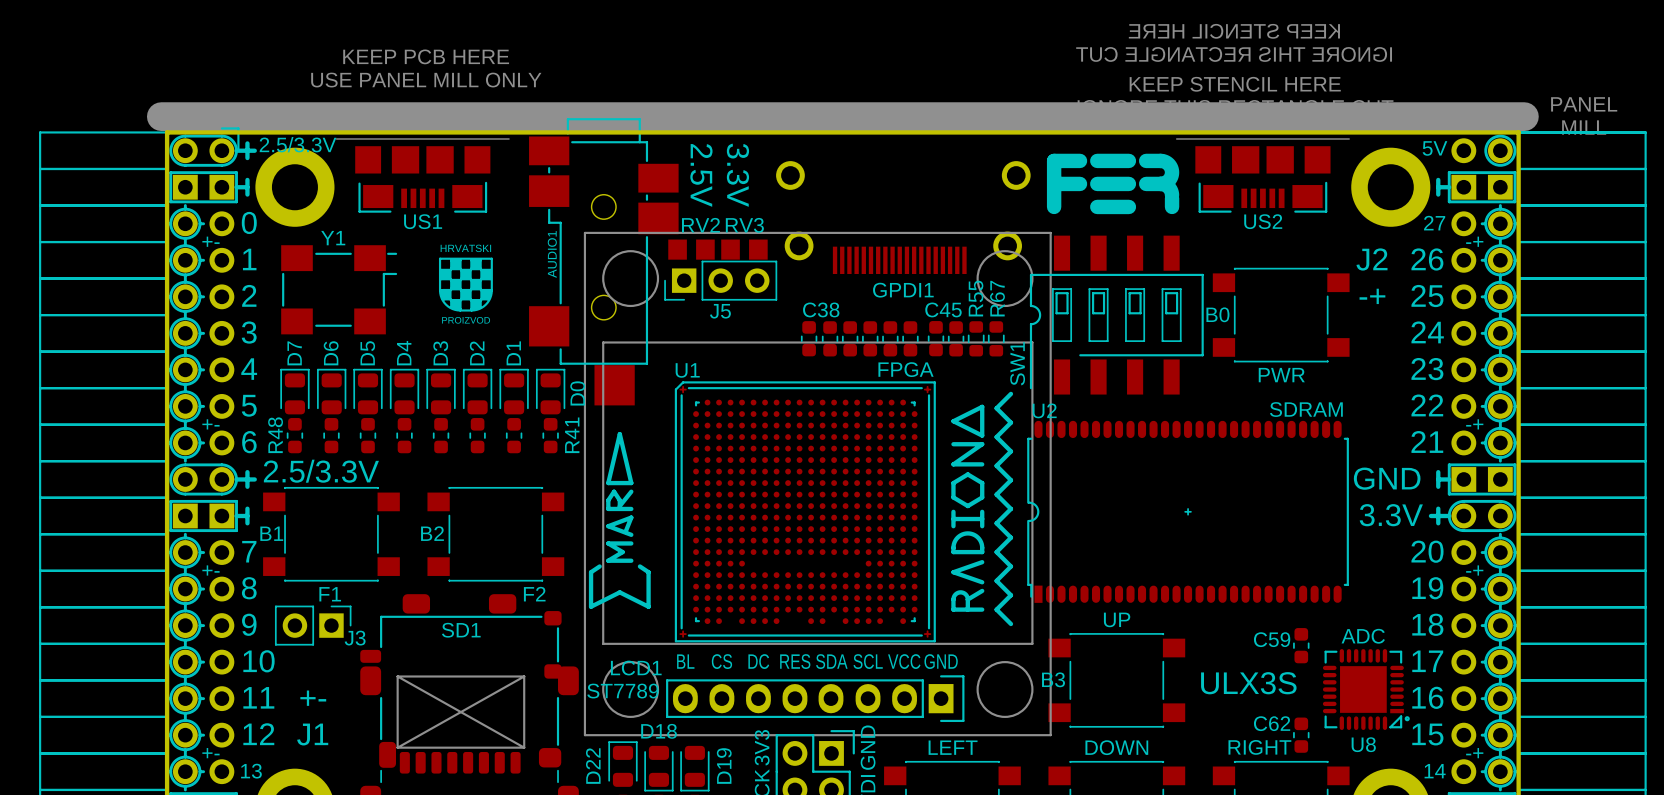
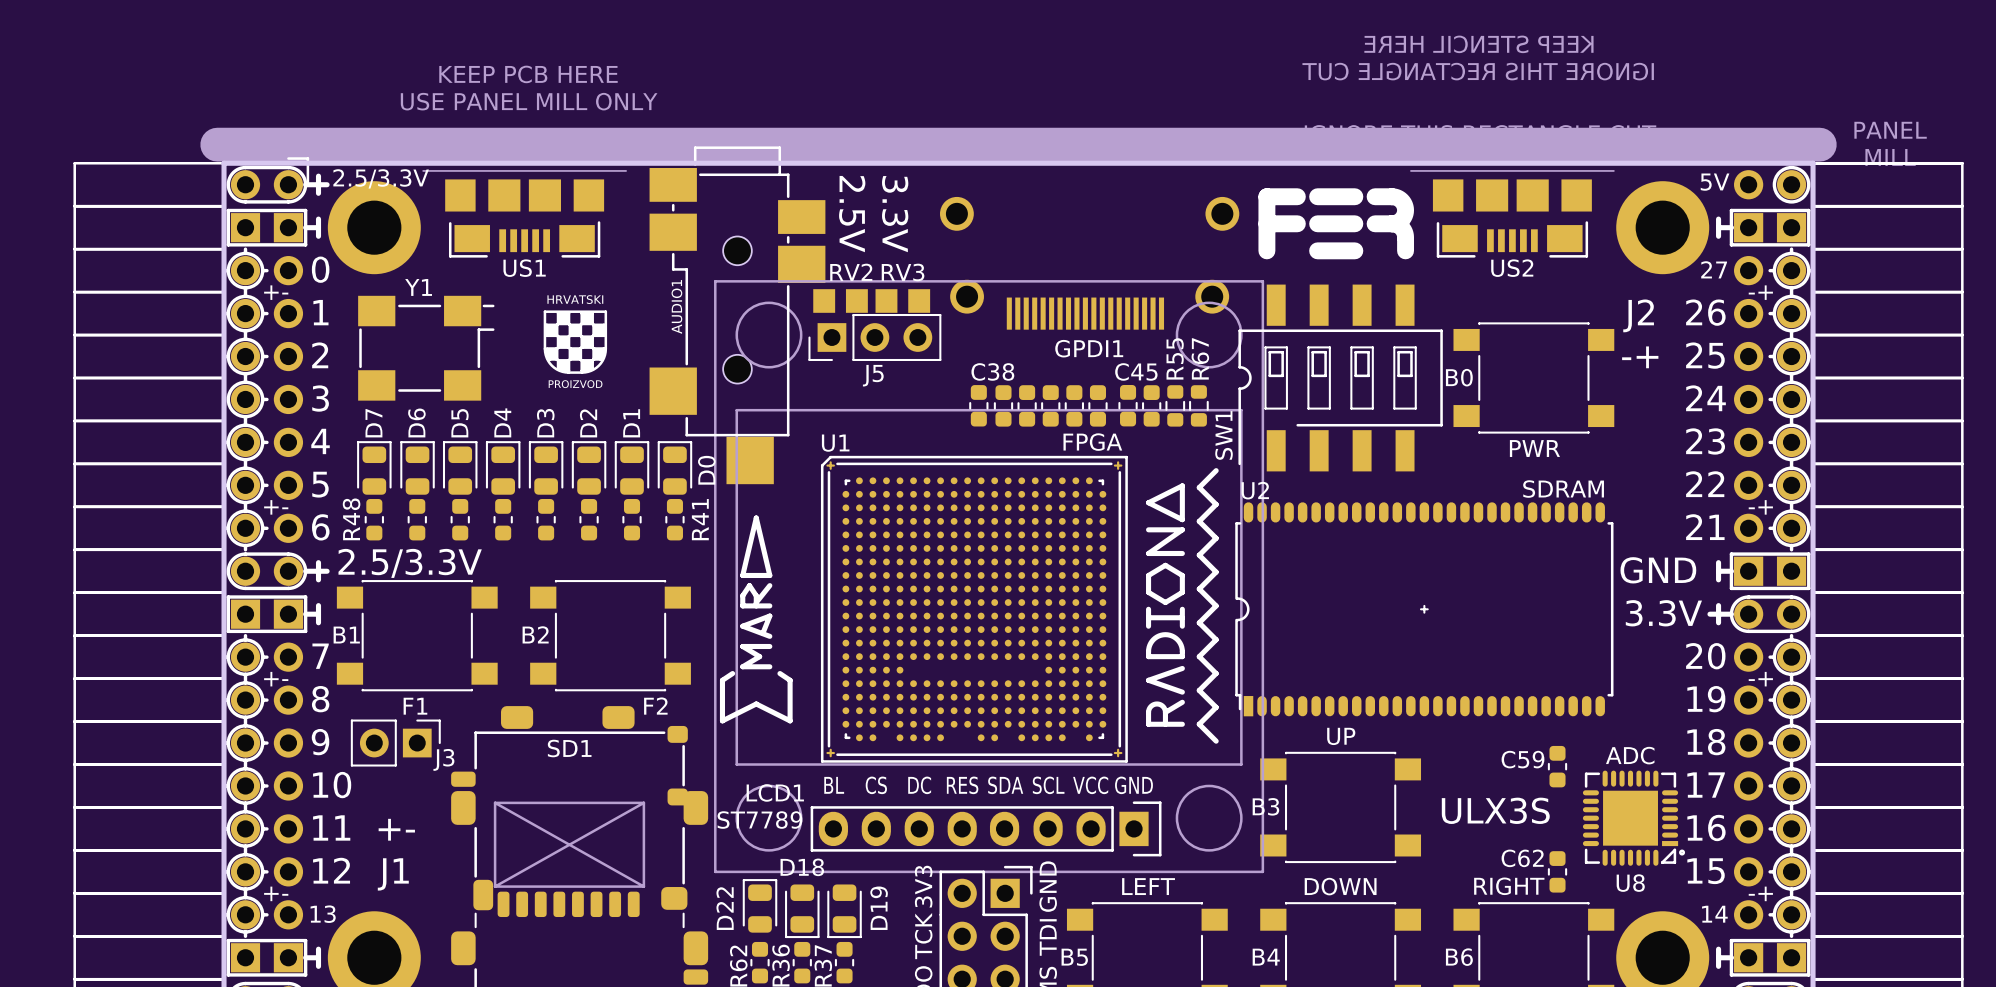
text: KEEP STENCIL HERE (1235, 84) -> none

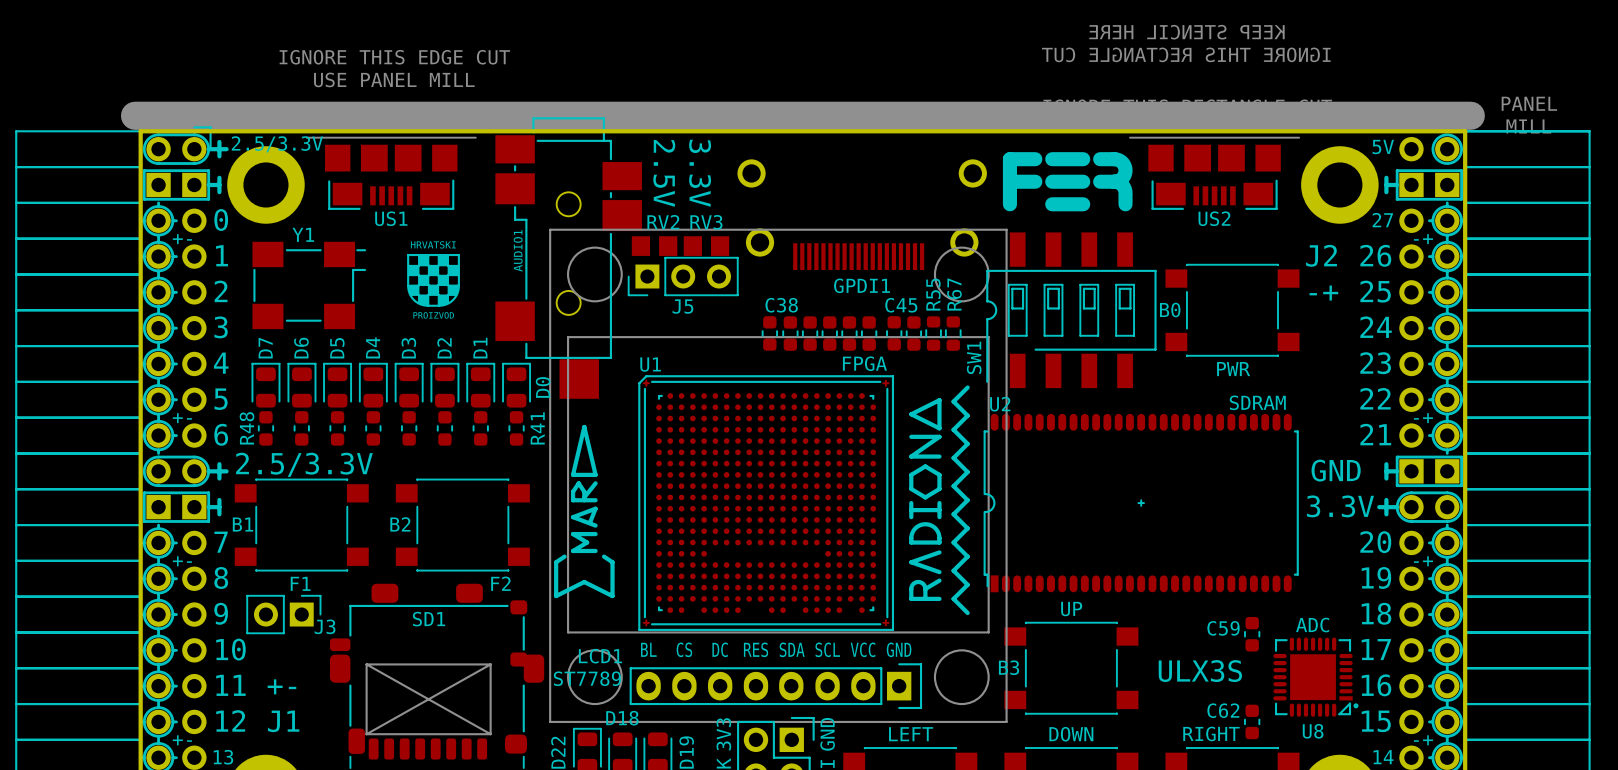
text: KEEP PCB HERE (528, 74) -> IGNORE THIS EDGE CUT (394, 57)
text: USE PANEL MILL ONLY (529, 101) -> USE PANEL MILL (394, 79)

